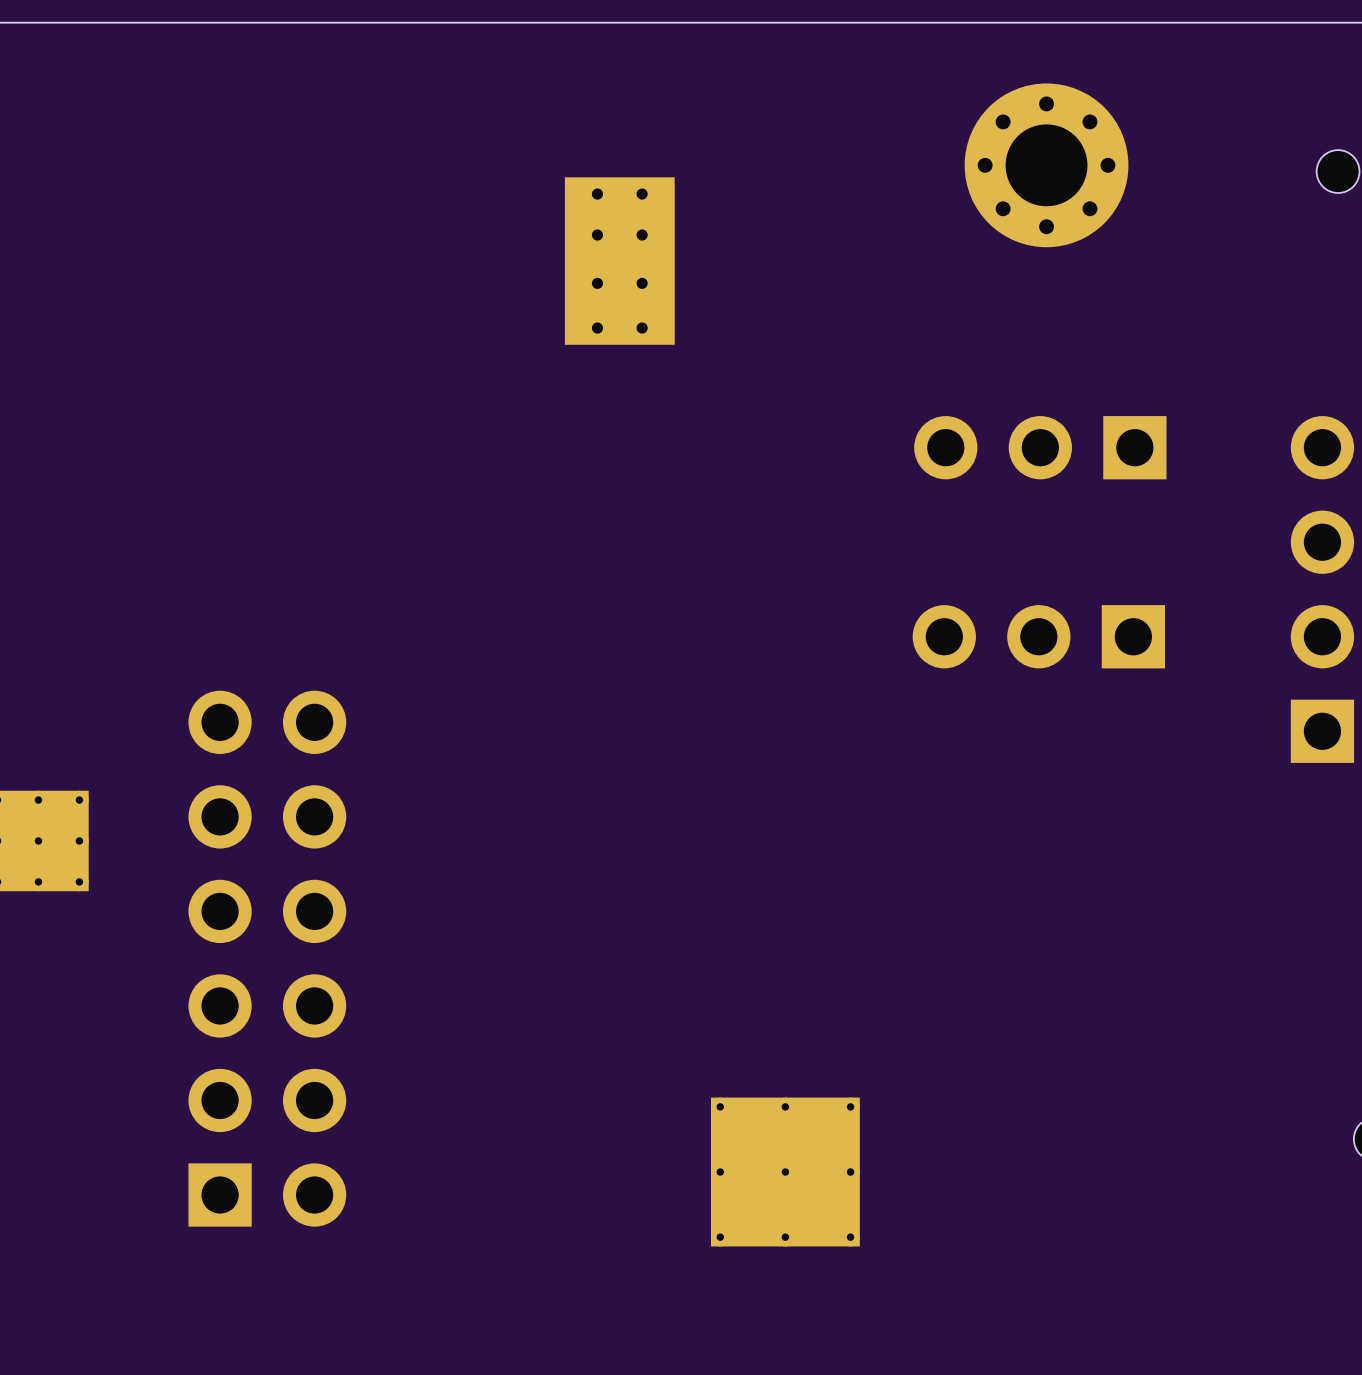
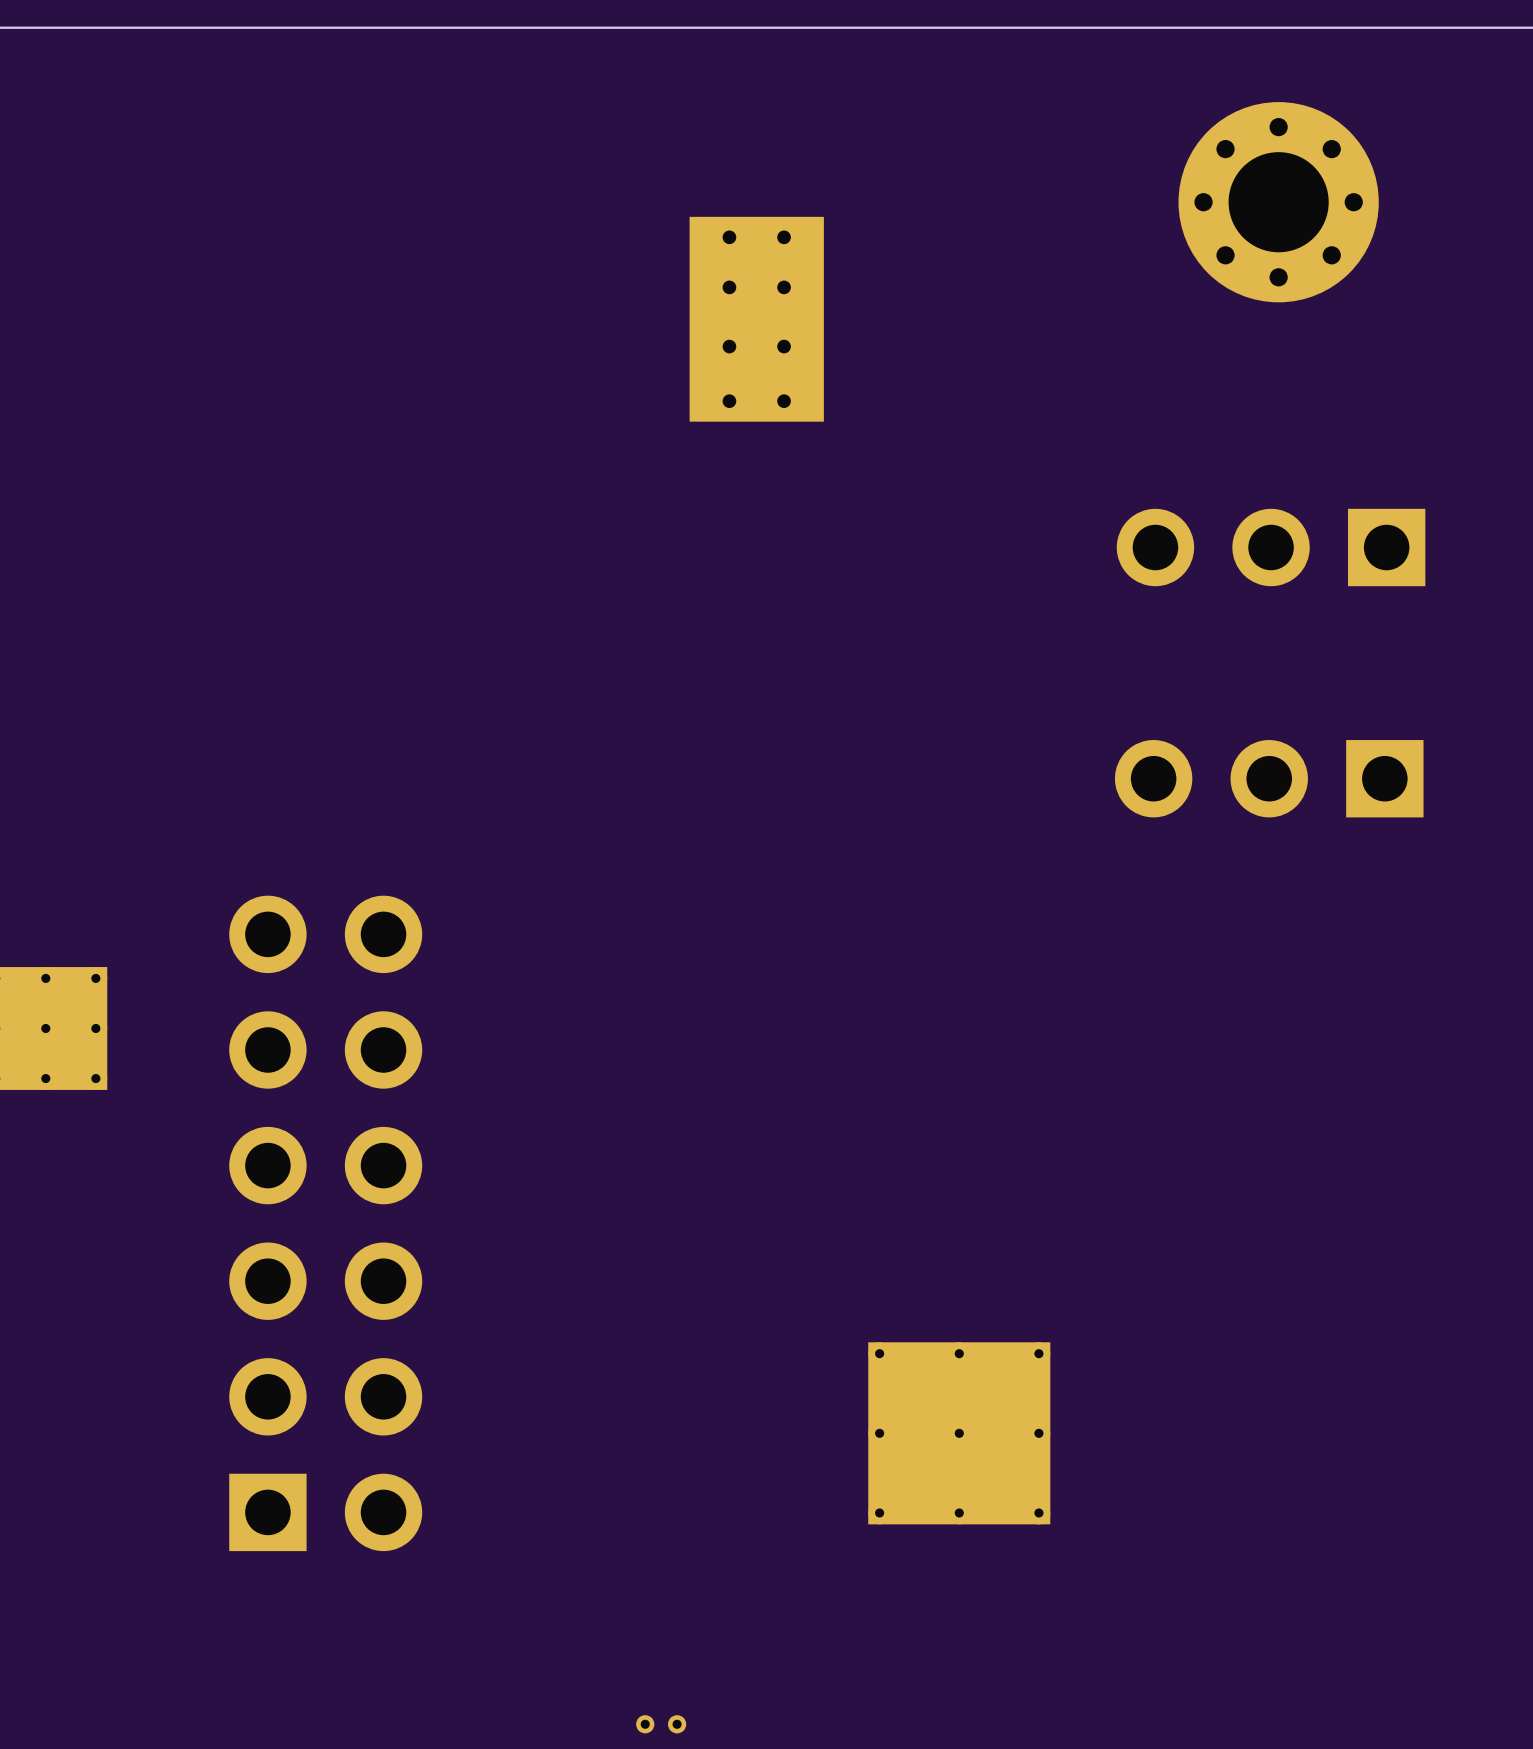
part position: (267, 958) -> (325, 1223)

